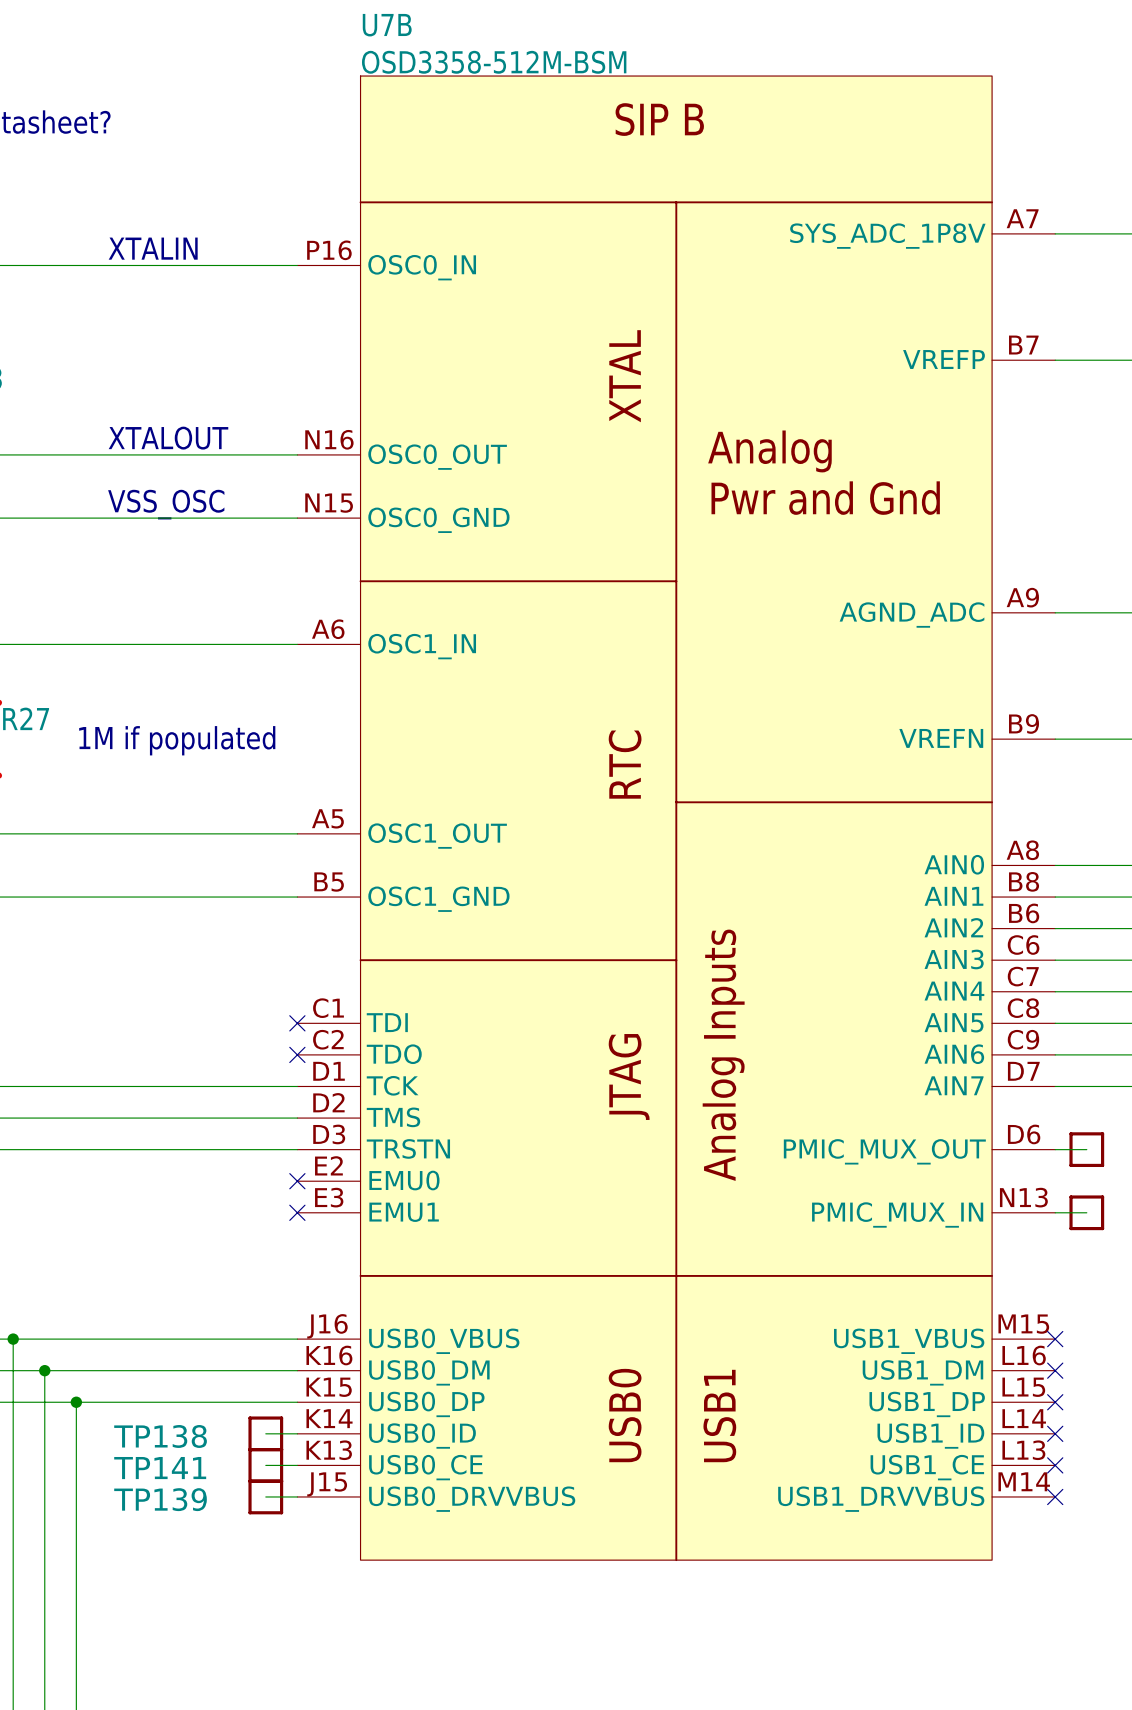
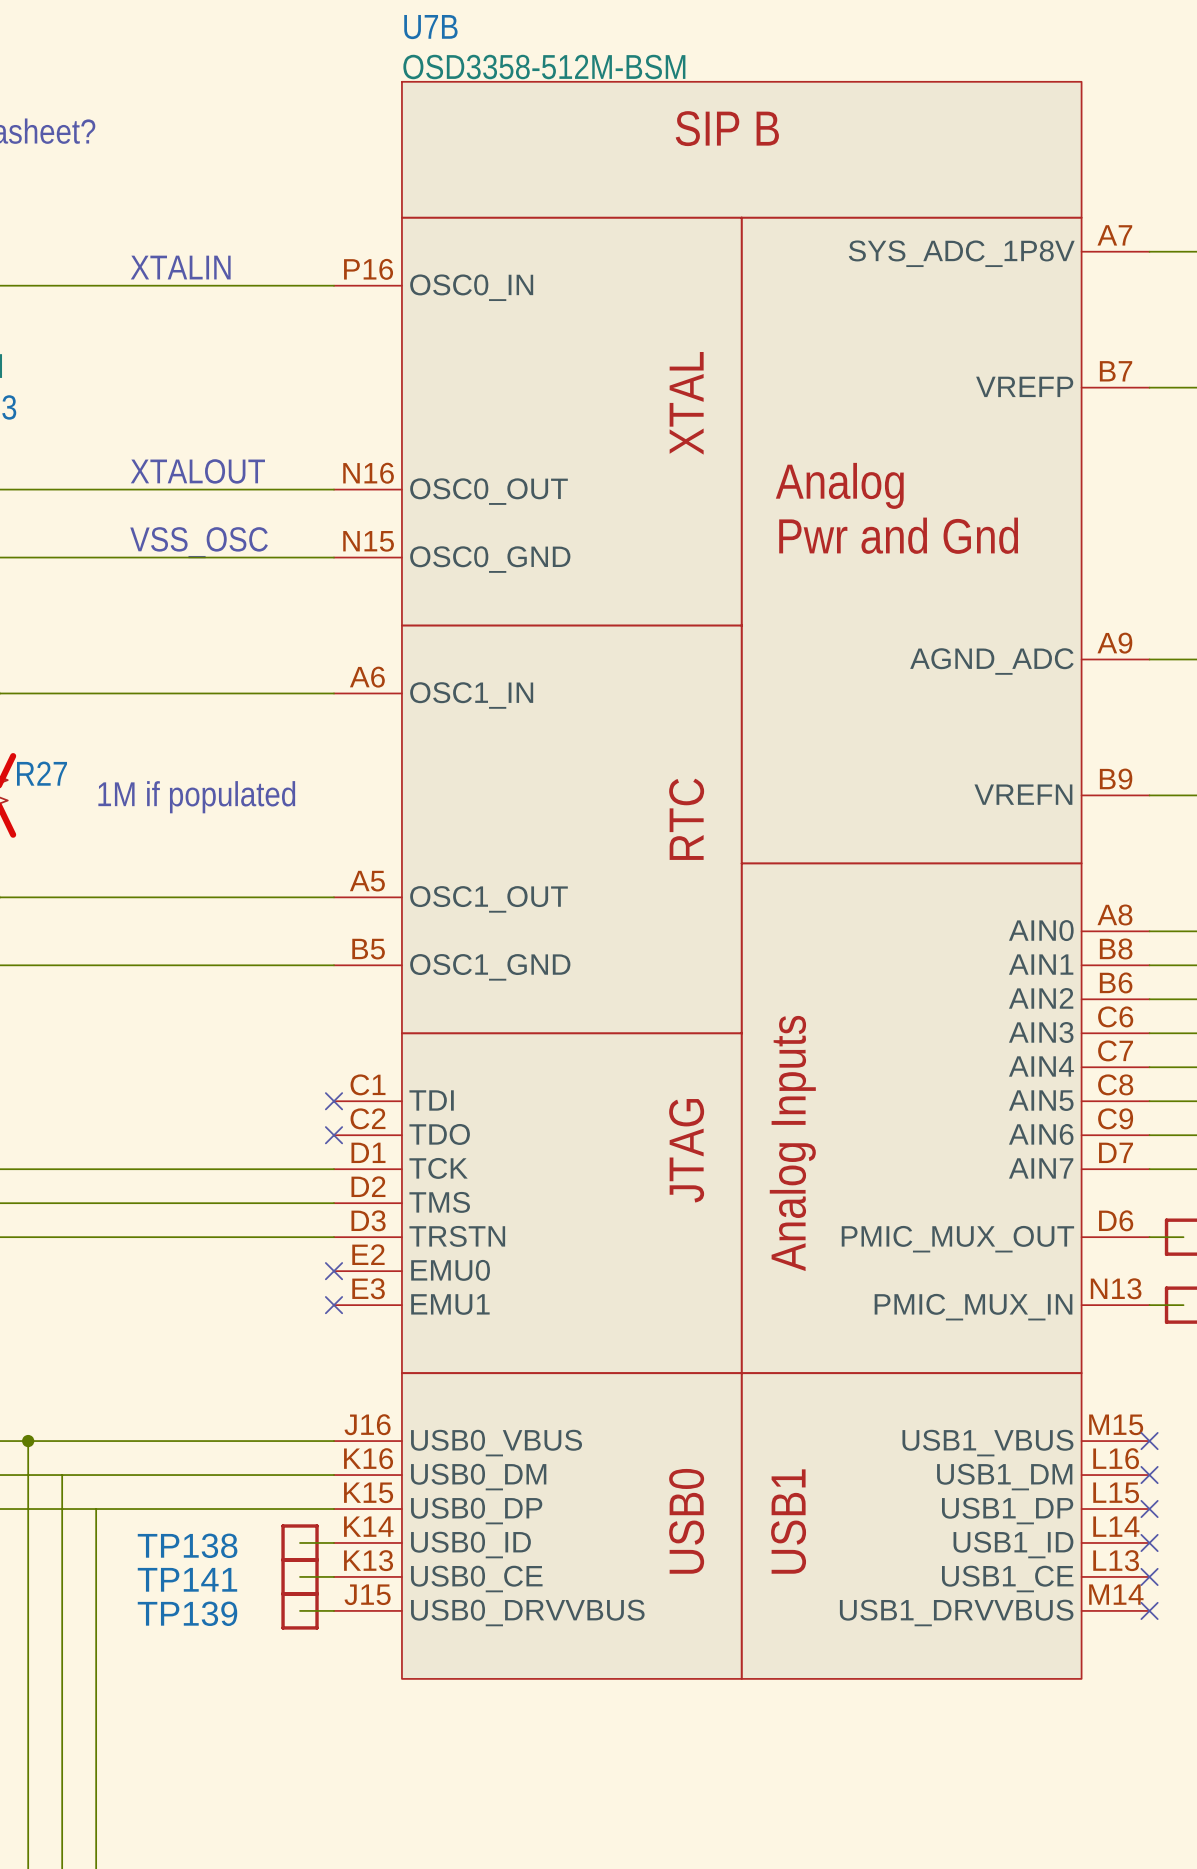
junction: (44, 1370) -> none
junction: (76, 1402) -> none

